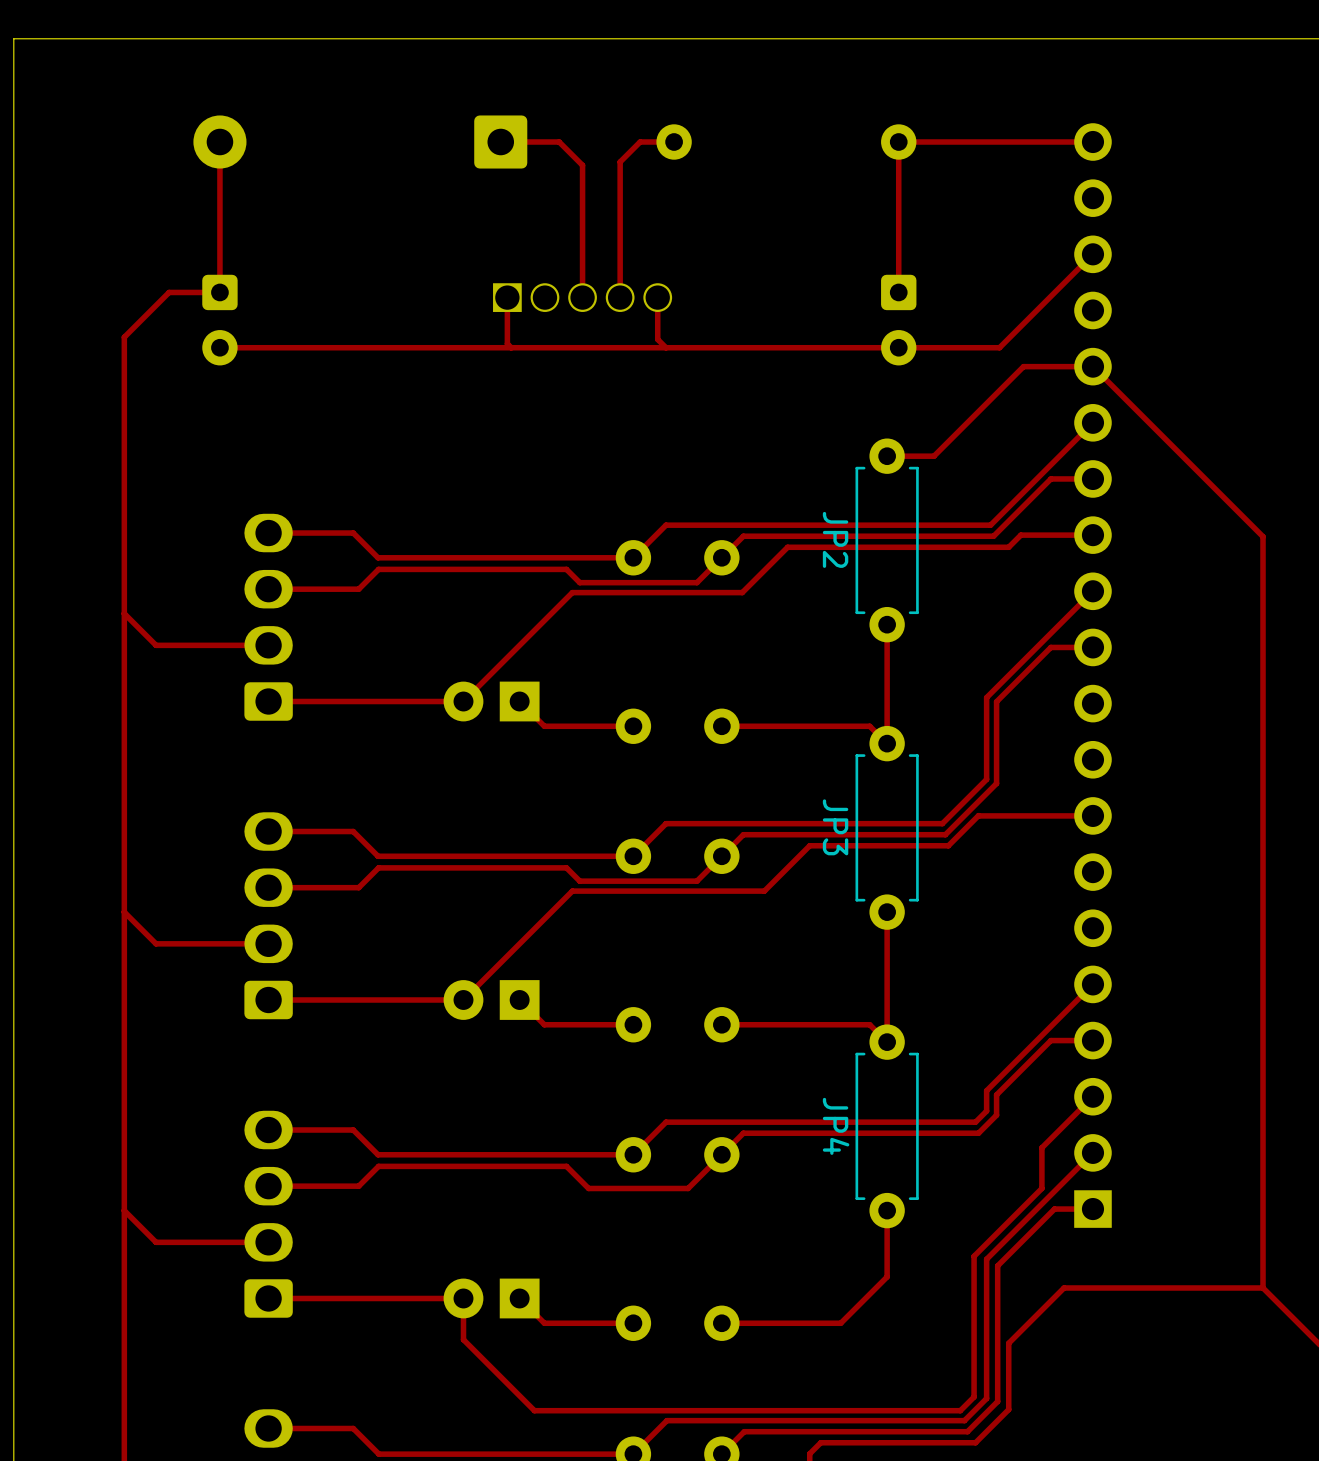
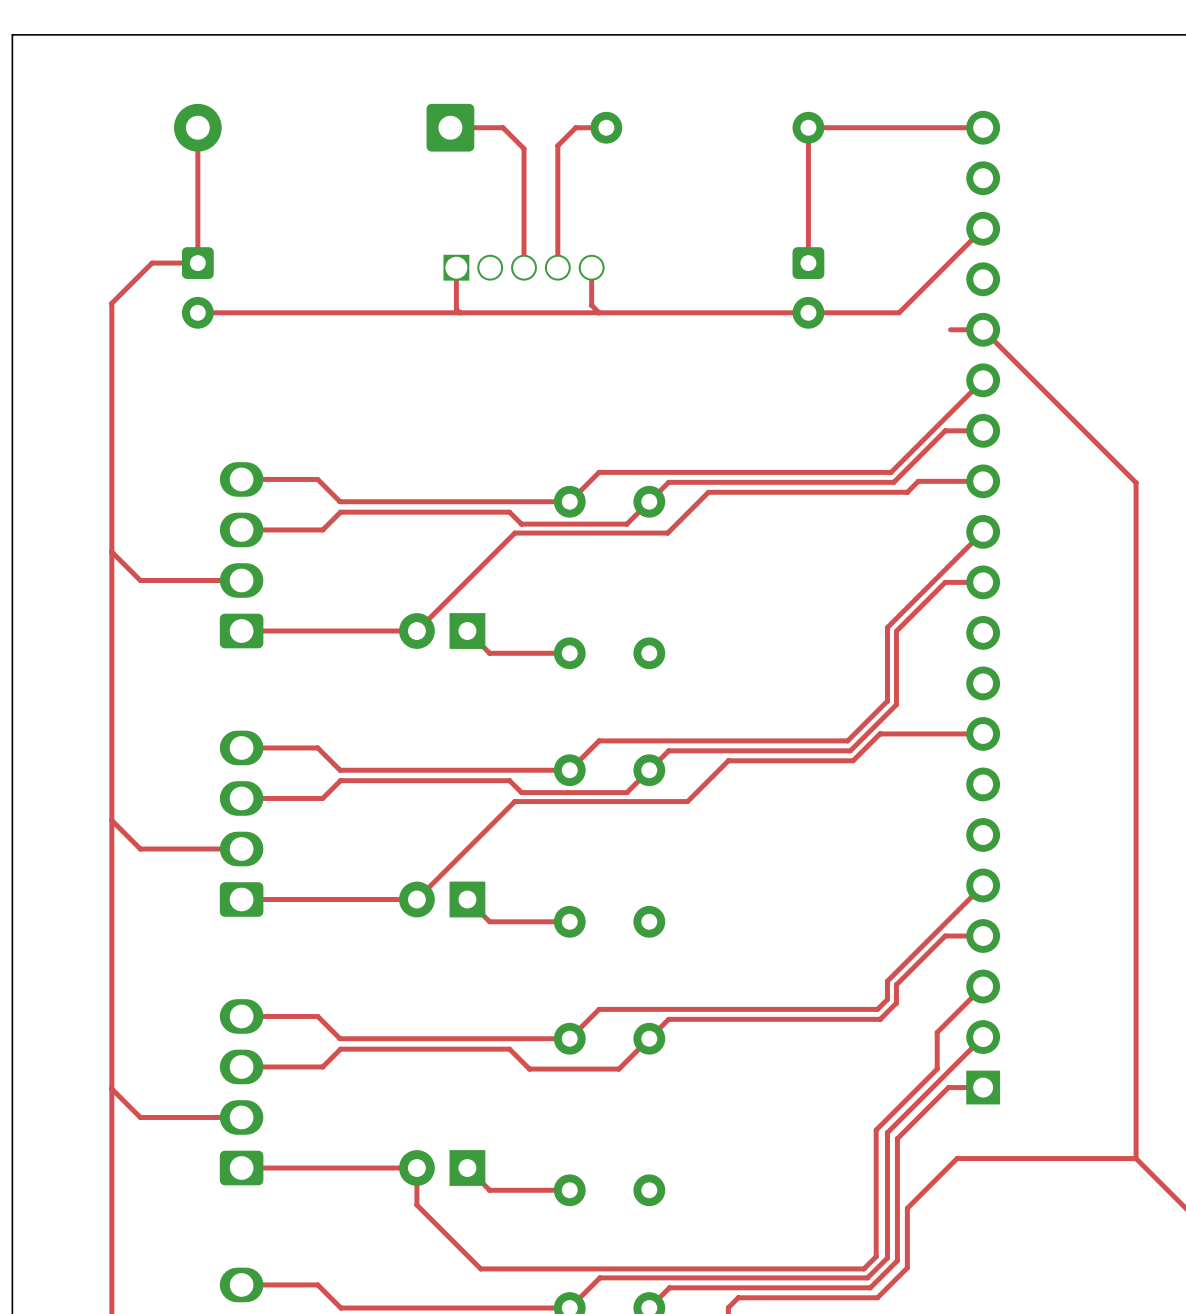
top track: (1056, 366) (1023, 366) (934, 456) (887, 456) -> none
JP2: (887, 540) -> none
top track: (887, 624) (887, 743) (869, 726) (721, 726) -> none
JP3: (887, 827) -> none
top track: (887, 912) (887, 1042) (869, 1024) (721, 1024) -> none
JP4: (887, 1126) -> none
top track: (887, 1210) (887, 1276) (840, 1323) (721, 1323) -> none

